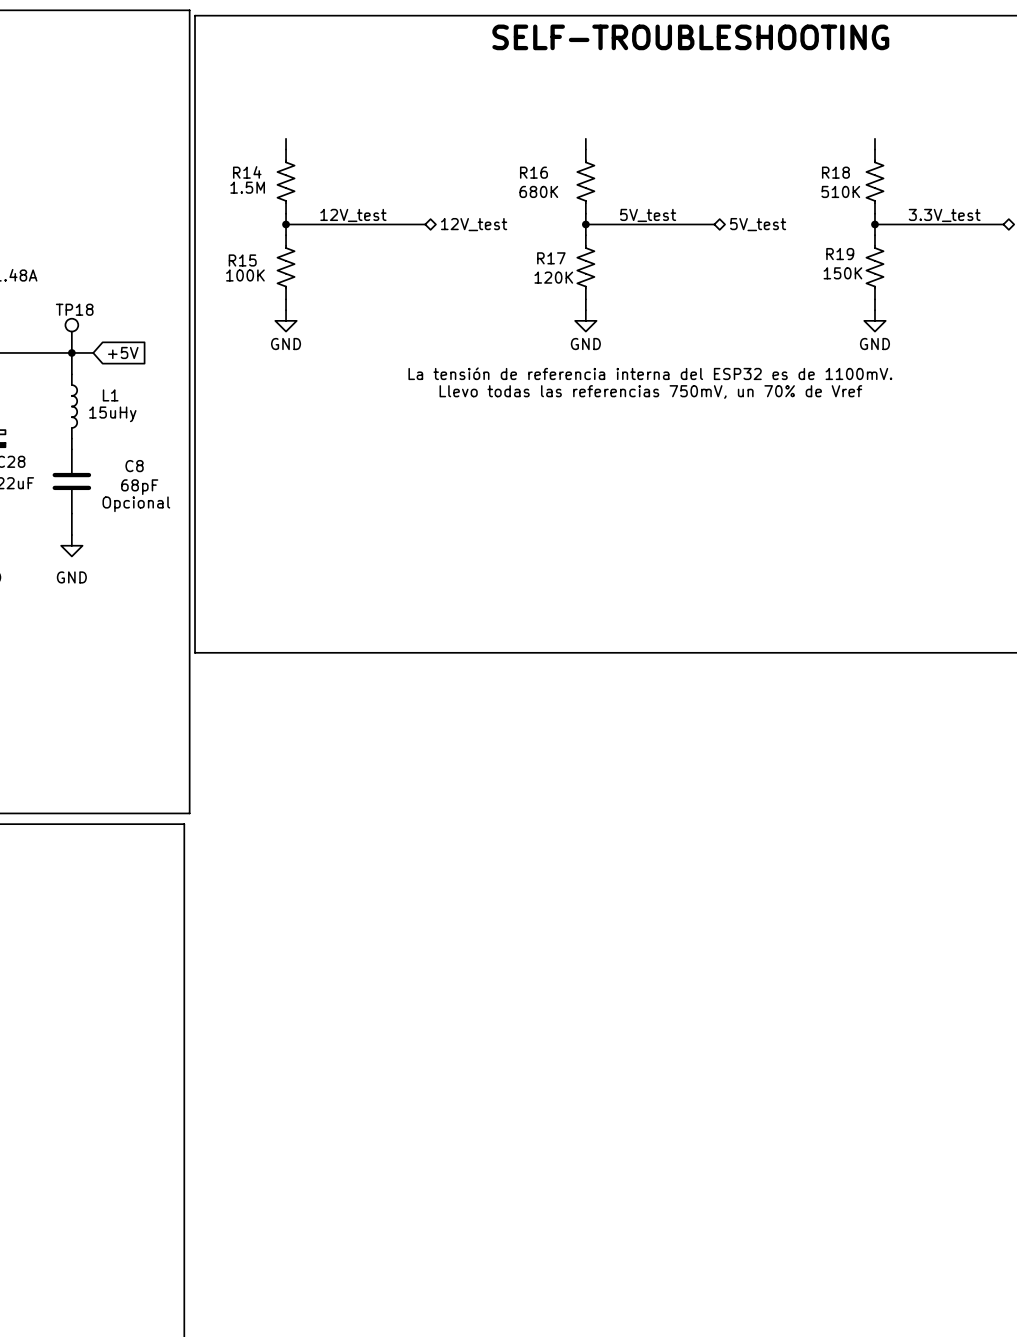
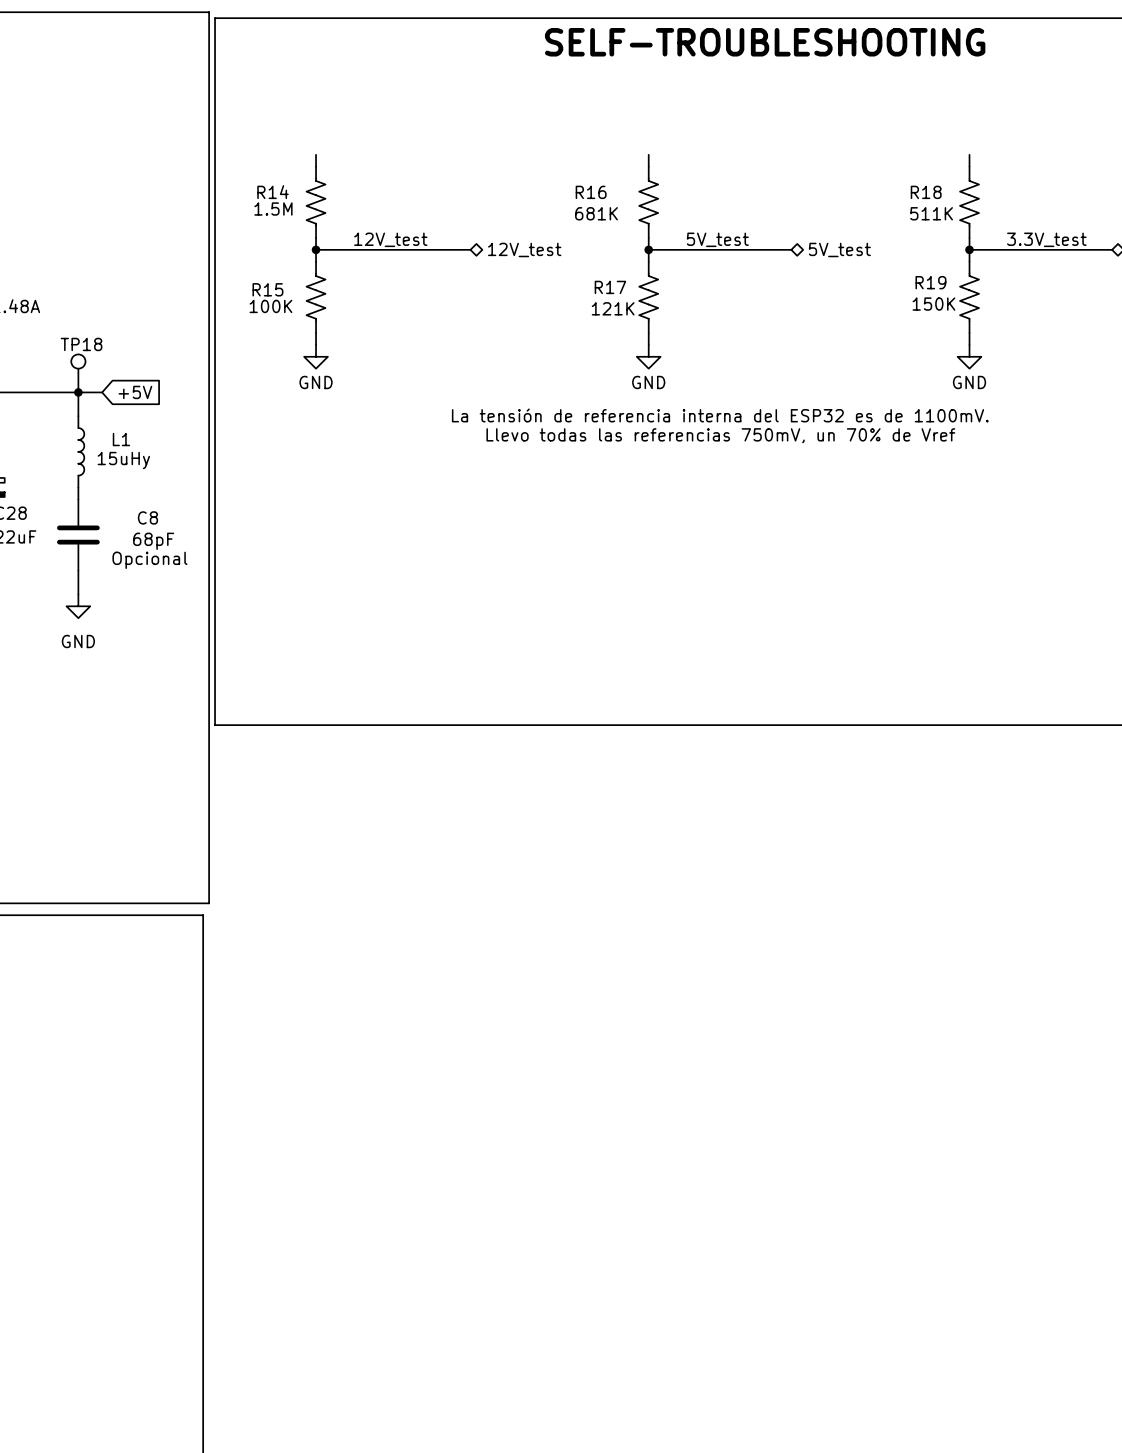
R16 value: 680K (538, 191) -> 681K (596, 213)
R18 value: 510K (840, 191) -> 511K (931, 213)
R17 value: 120K (553, 277) -> 121K (613, 308)

